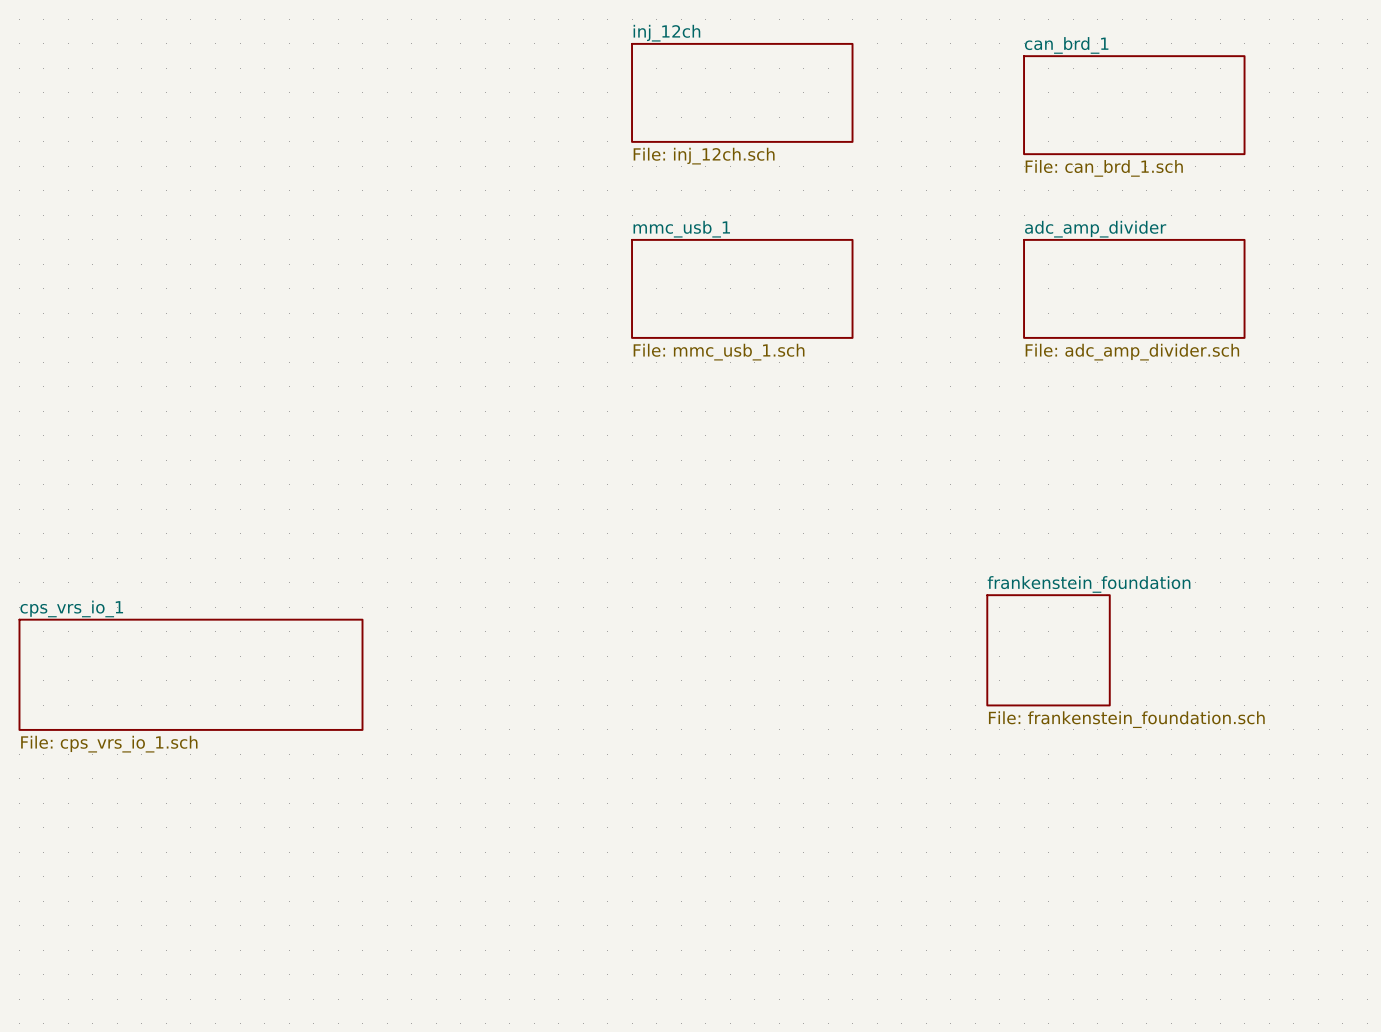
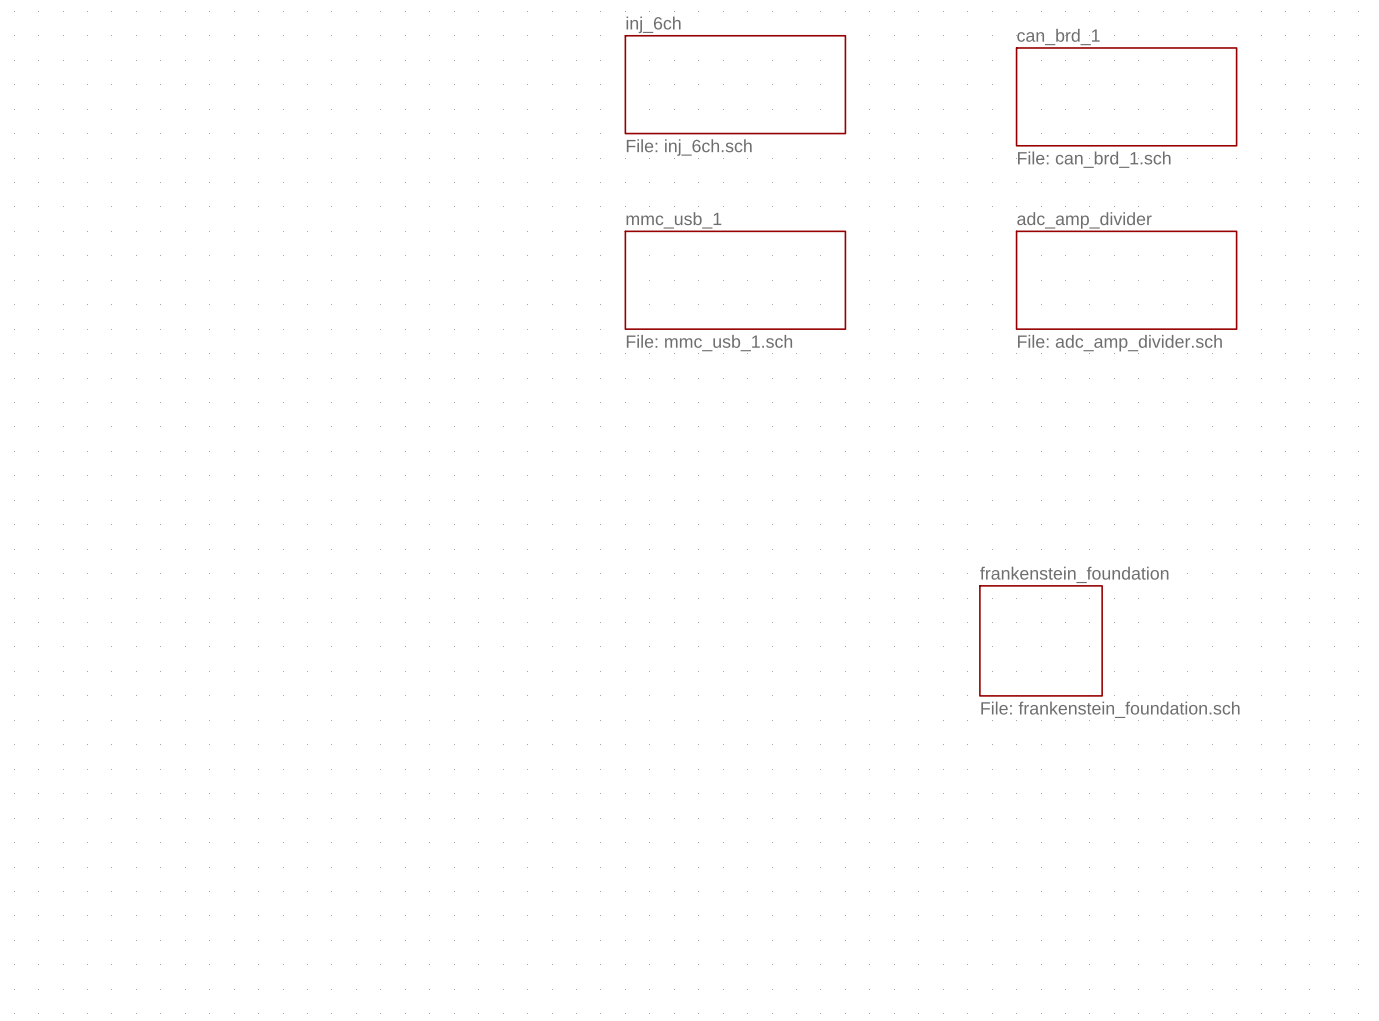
sheet inj_12ch name: inj_12ch (666, 33) -> inj_6ch (653, 24)
sheet inj_12ch value: File: inj_12ch.sch (704, 156) -> File: inj_6ch.sch (689, 147)
sheet cps_vrs_io_1: File: cps_vrs_io_1.sch (190, 674) -> none

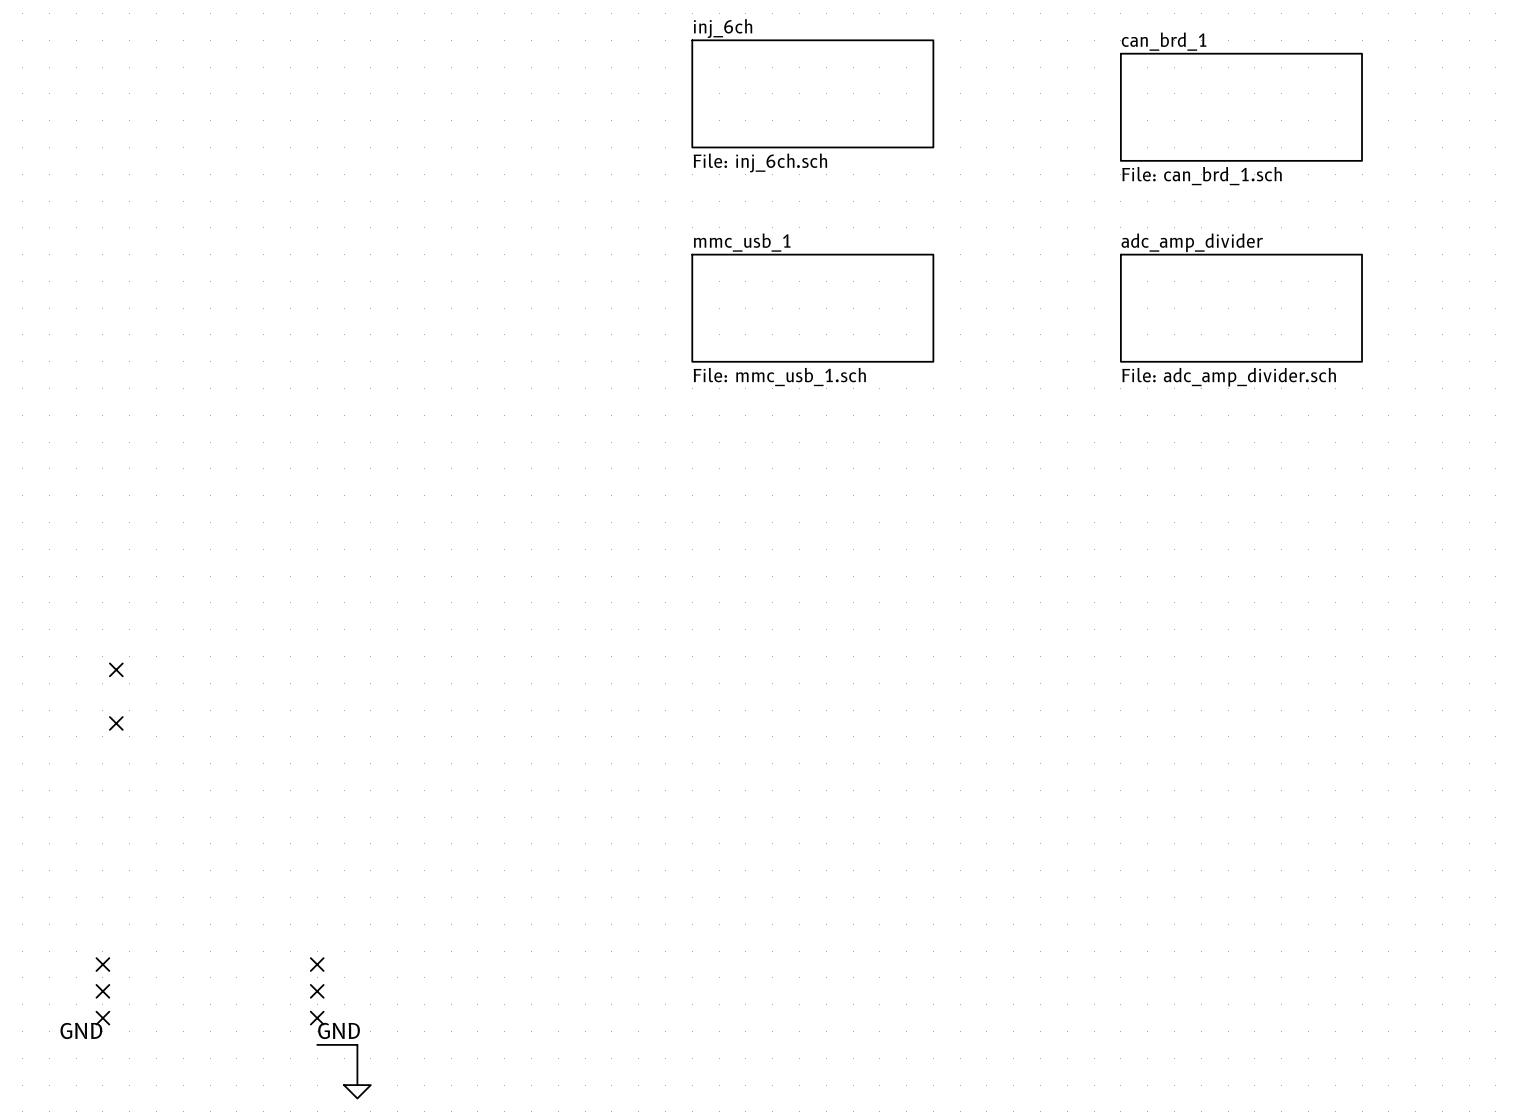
no-connect mark: none -> (116, 669)
sheet frankenstein_foundation: File: frankenstein_foundation.sch (1041, 640) -> none
no-connect mark: none -> (116, 723)
no-connect mark: none -> (102, 964)
no-connect mark: none -> (317, 964)
no-connect mark: none -> (102, 991)
no-connect mark: none -> (317, 991)
no-connect mark: none -> (102, 1018)
no-connect mark: none -> (317, 1018)
label: none -> GND (81, 1030)
label: none -> GND (339, 1030)
wire: none -> (317, 1044) (357, 1044) (357, 1085)
power symbol: none -> (357, 1091)

